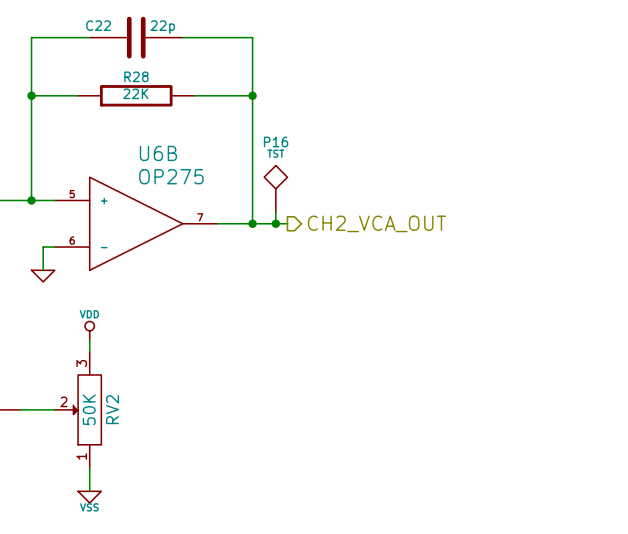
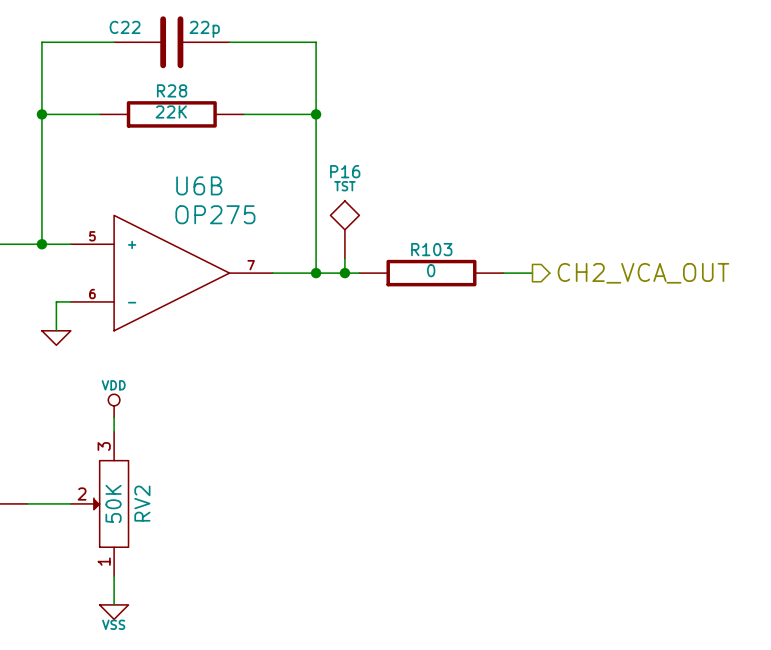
R103: none -> 0 (431, 273)
hierarchical label position: CH2_VCA_OUT (376, 223) -> CH2_VCA_OUT (643, 273)
wire: none -> (503, 273) (532, 273)

